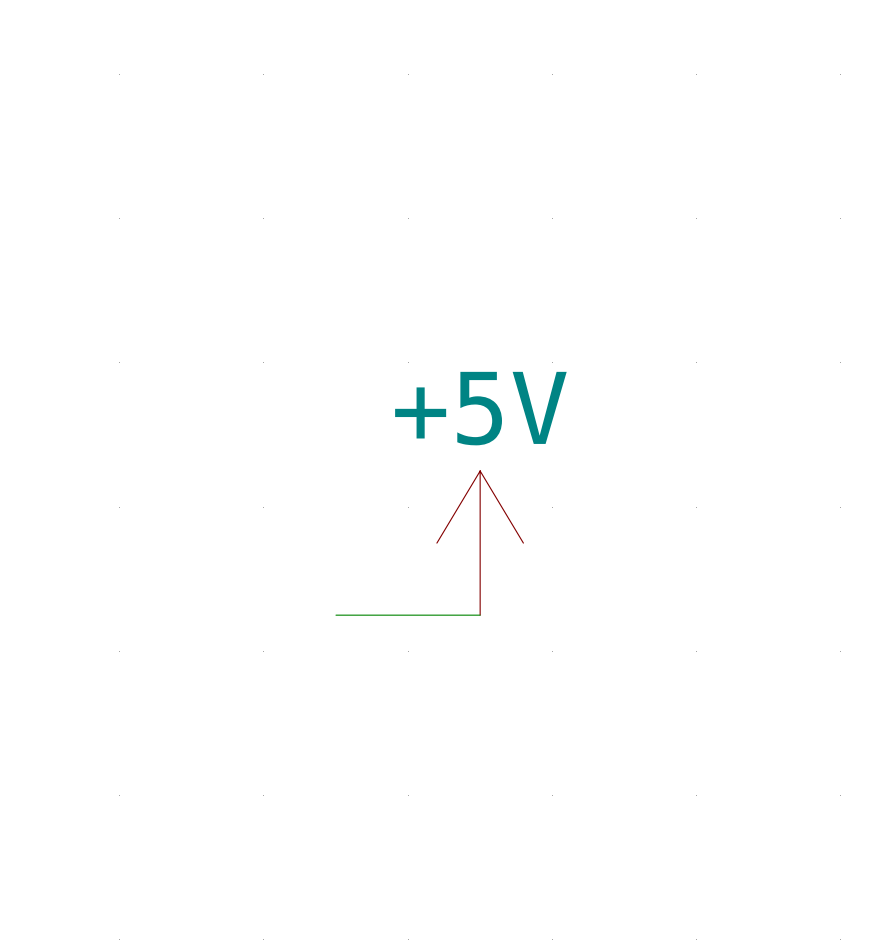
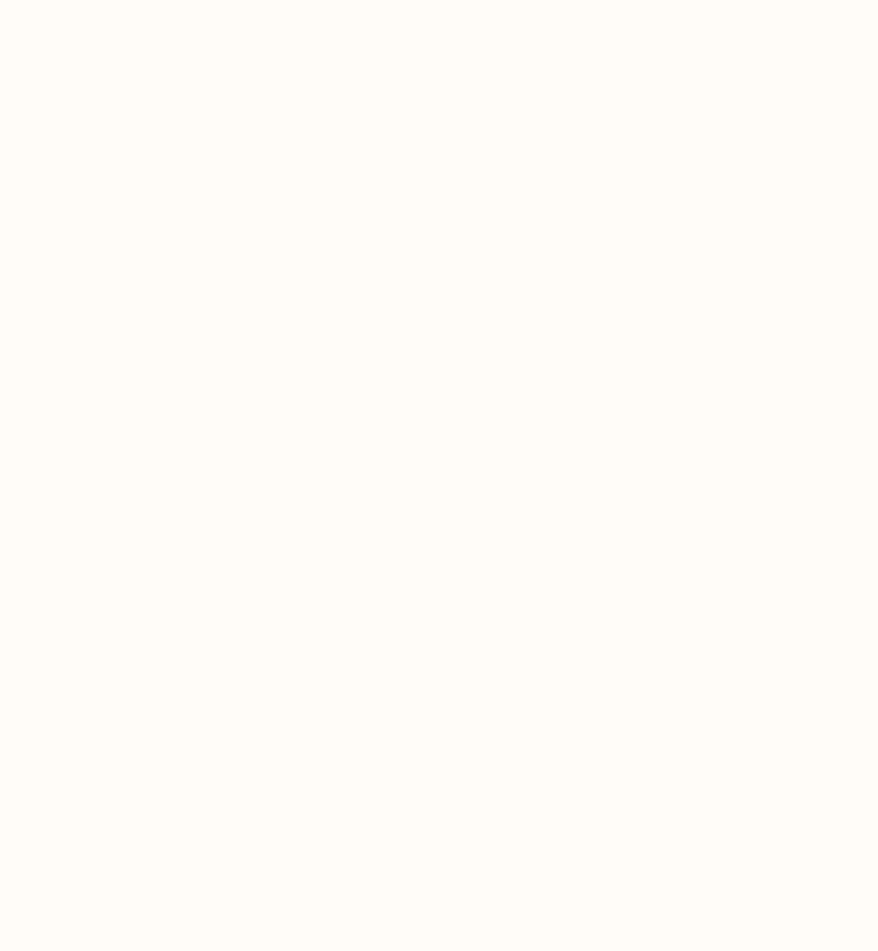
power symbol: +5V (480, 543) -> none
wire: (335, 615) (480, 615) -> none

